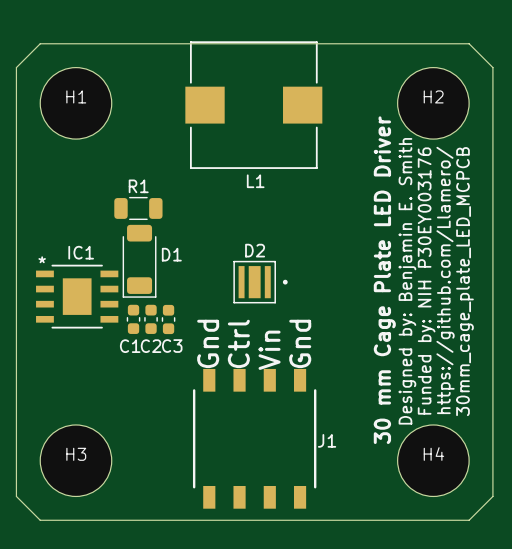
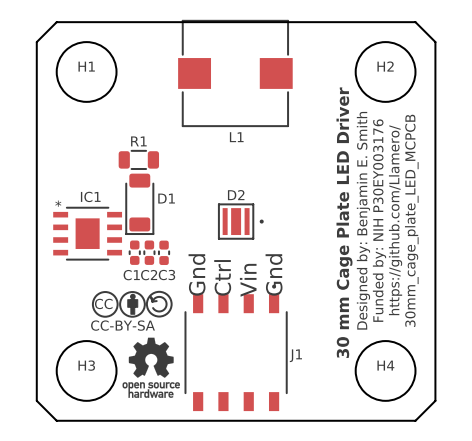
drawing: none -> [92, 291, 180, 398]

